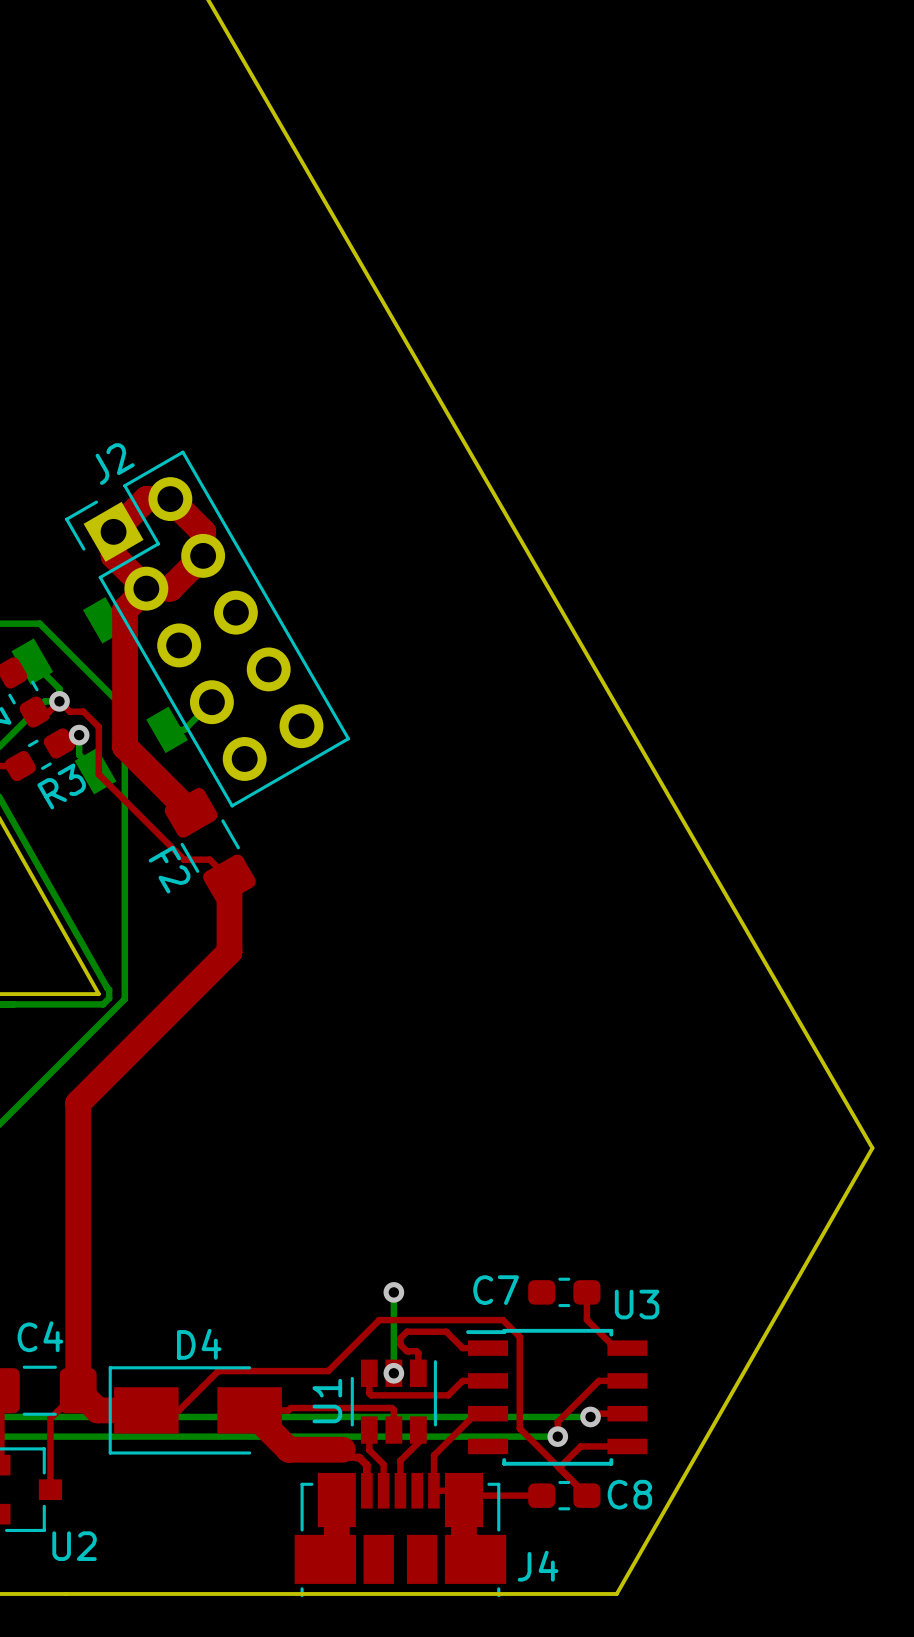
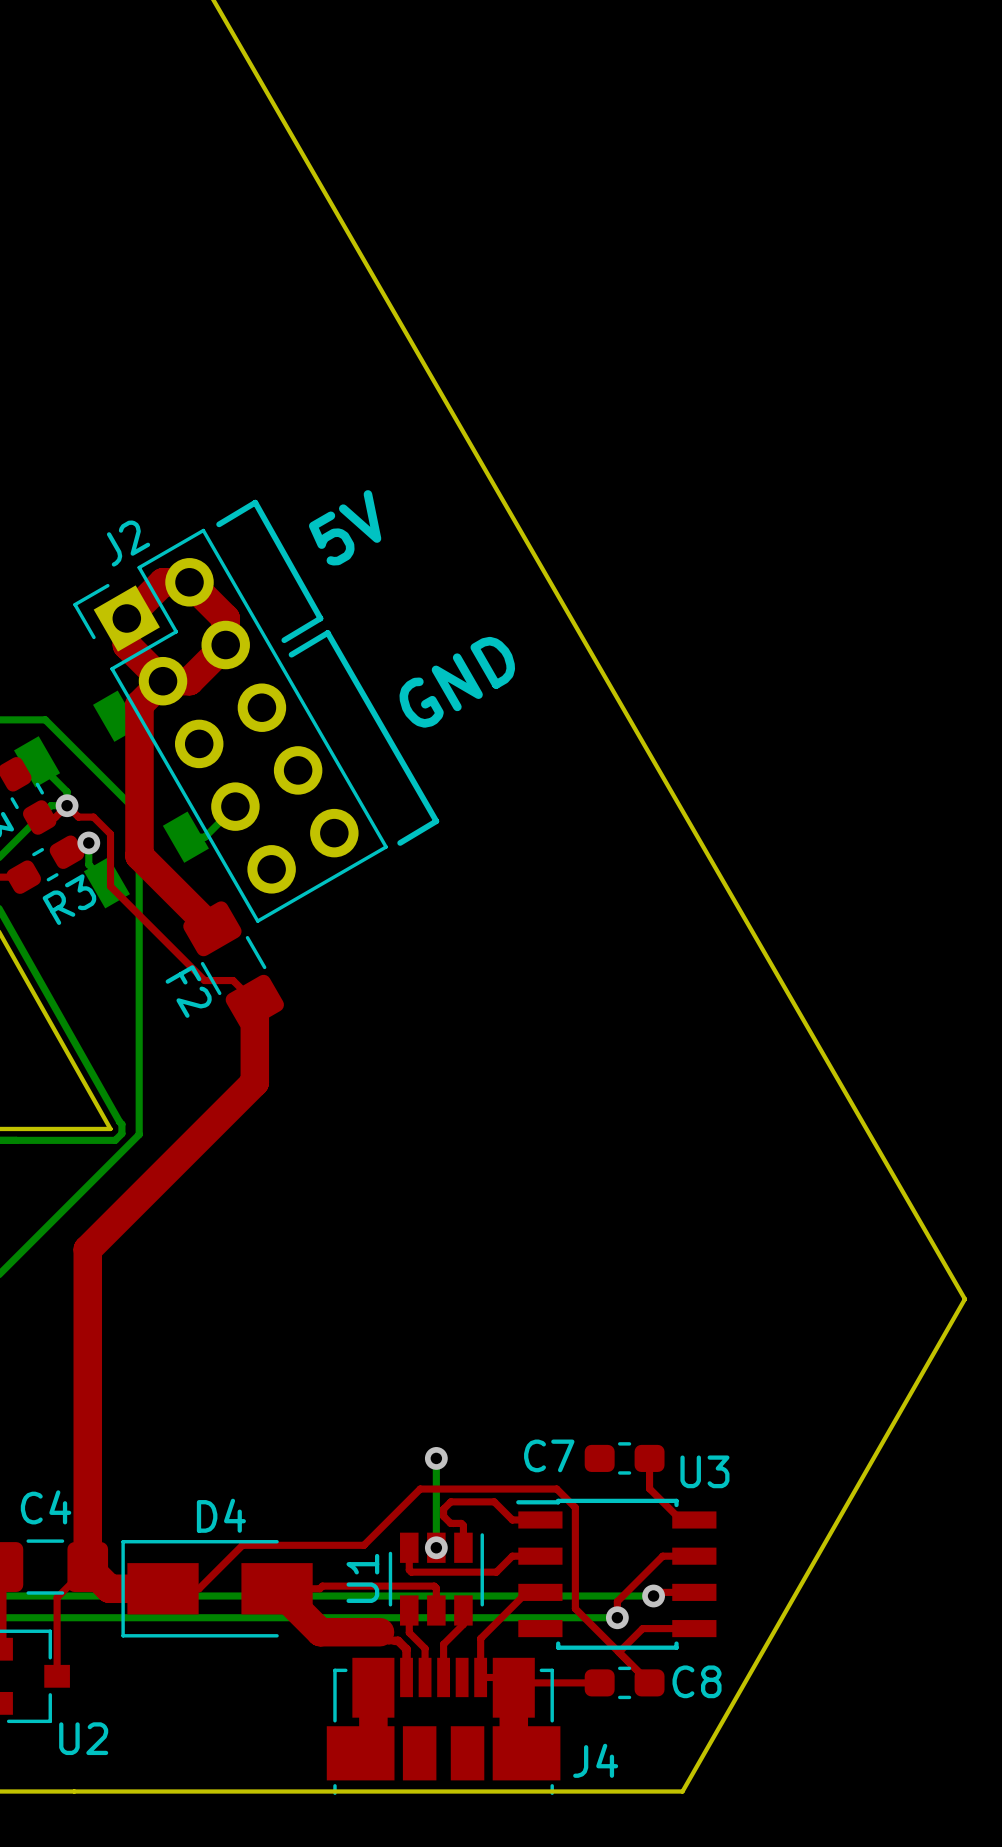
line: none -> (219, 524) (255, 502) (320, 618) (284, 640)
text: none -> 5V (345, 527)
line: none -> (291, 654) (327, 632) (436, 821) (400, 842)
text: none -> GND (457, 682)

